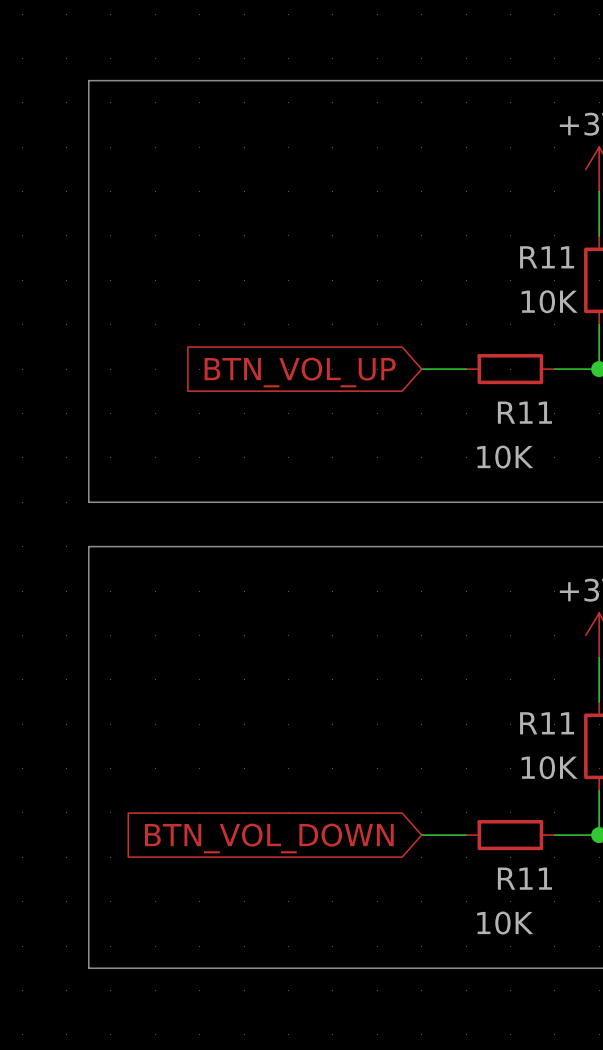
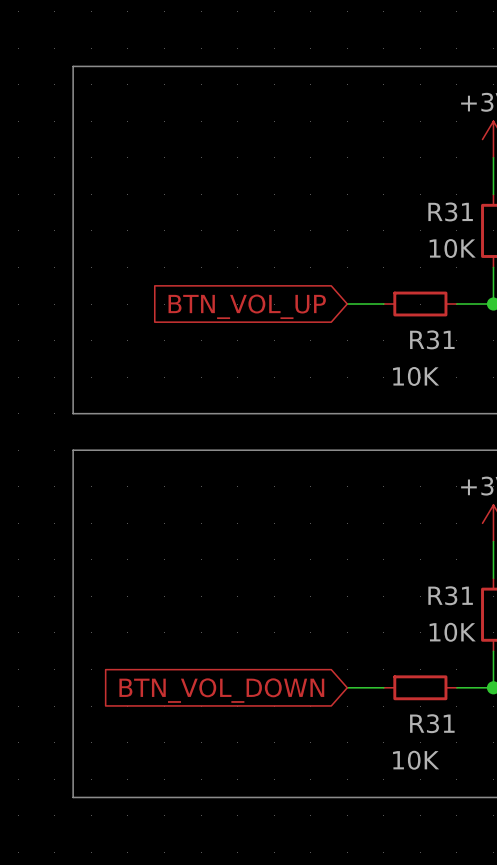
R11 name: R11 (547, 257) -> R31 (450, 211)
R11 name: R11 (524, 412) -> R31 (432, 339)
R11 name: R11 (547, 723) -> R31 (450, 595)
R11 name: R11 (524, 878) -> R31 (432, 723)

